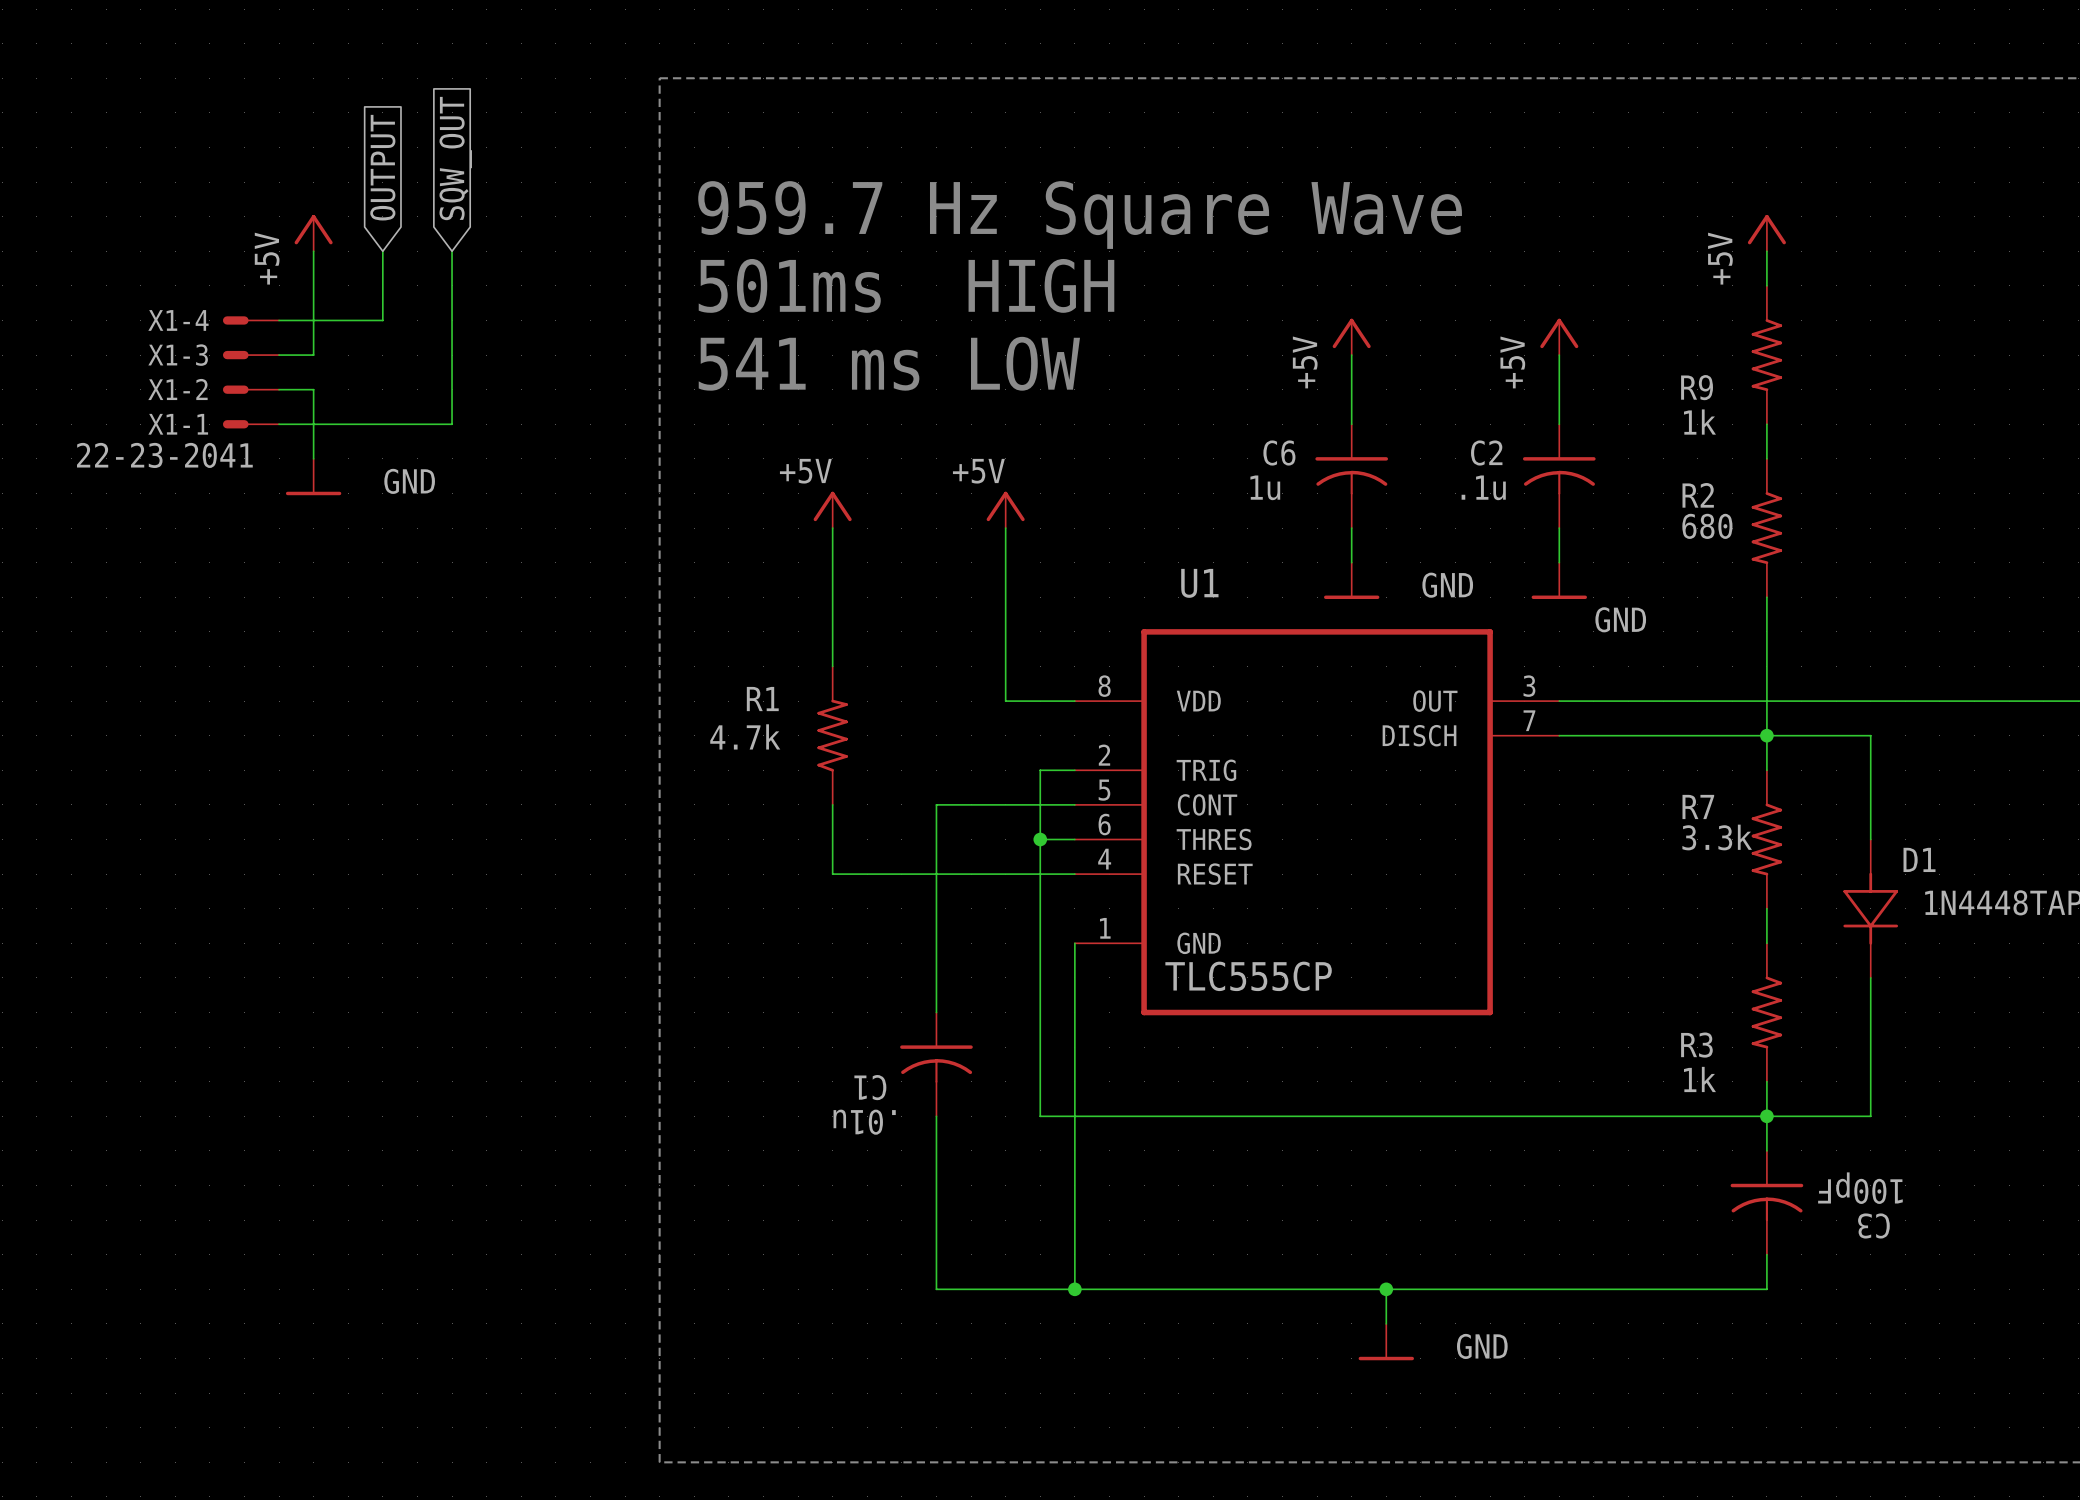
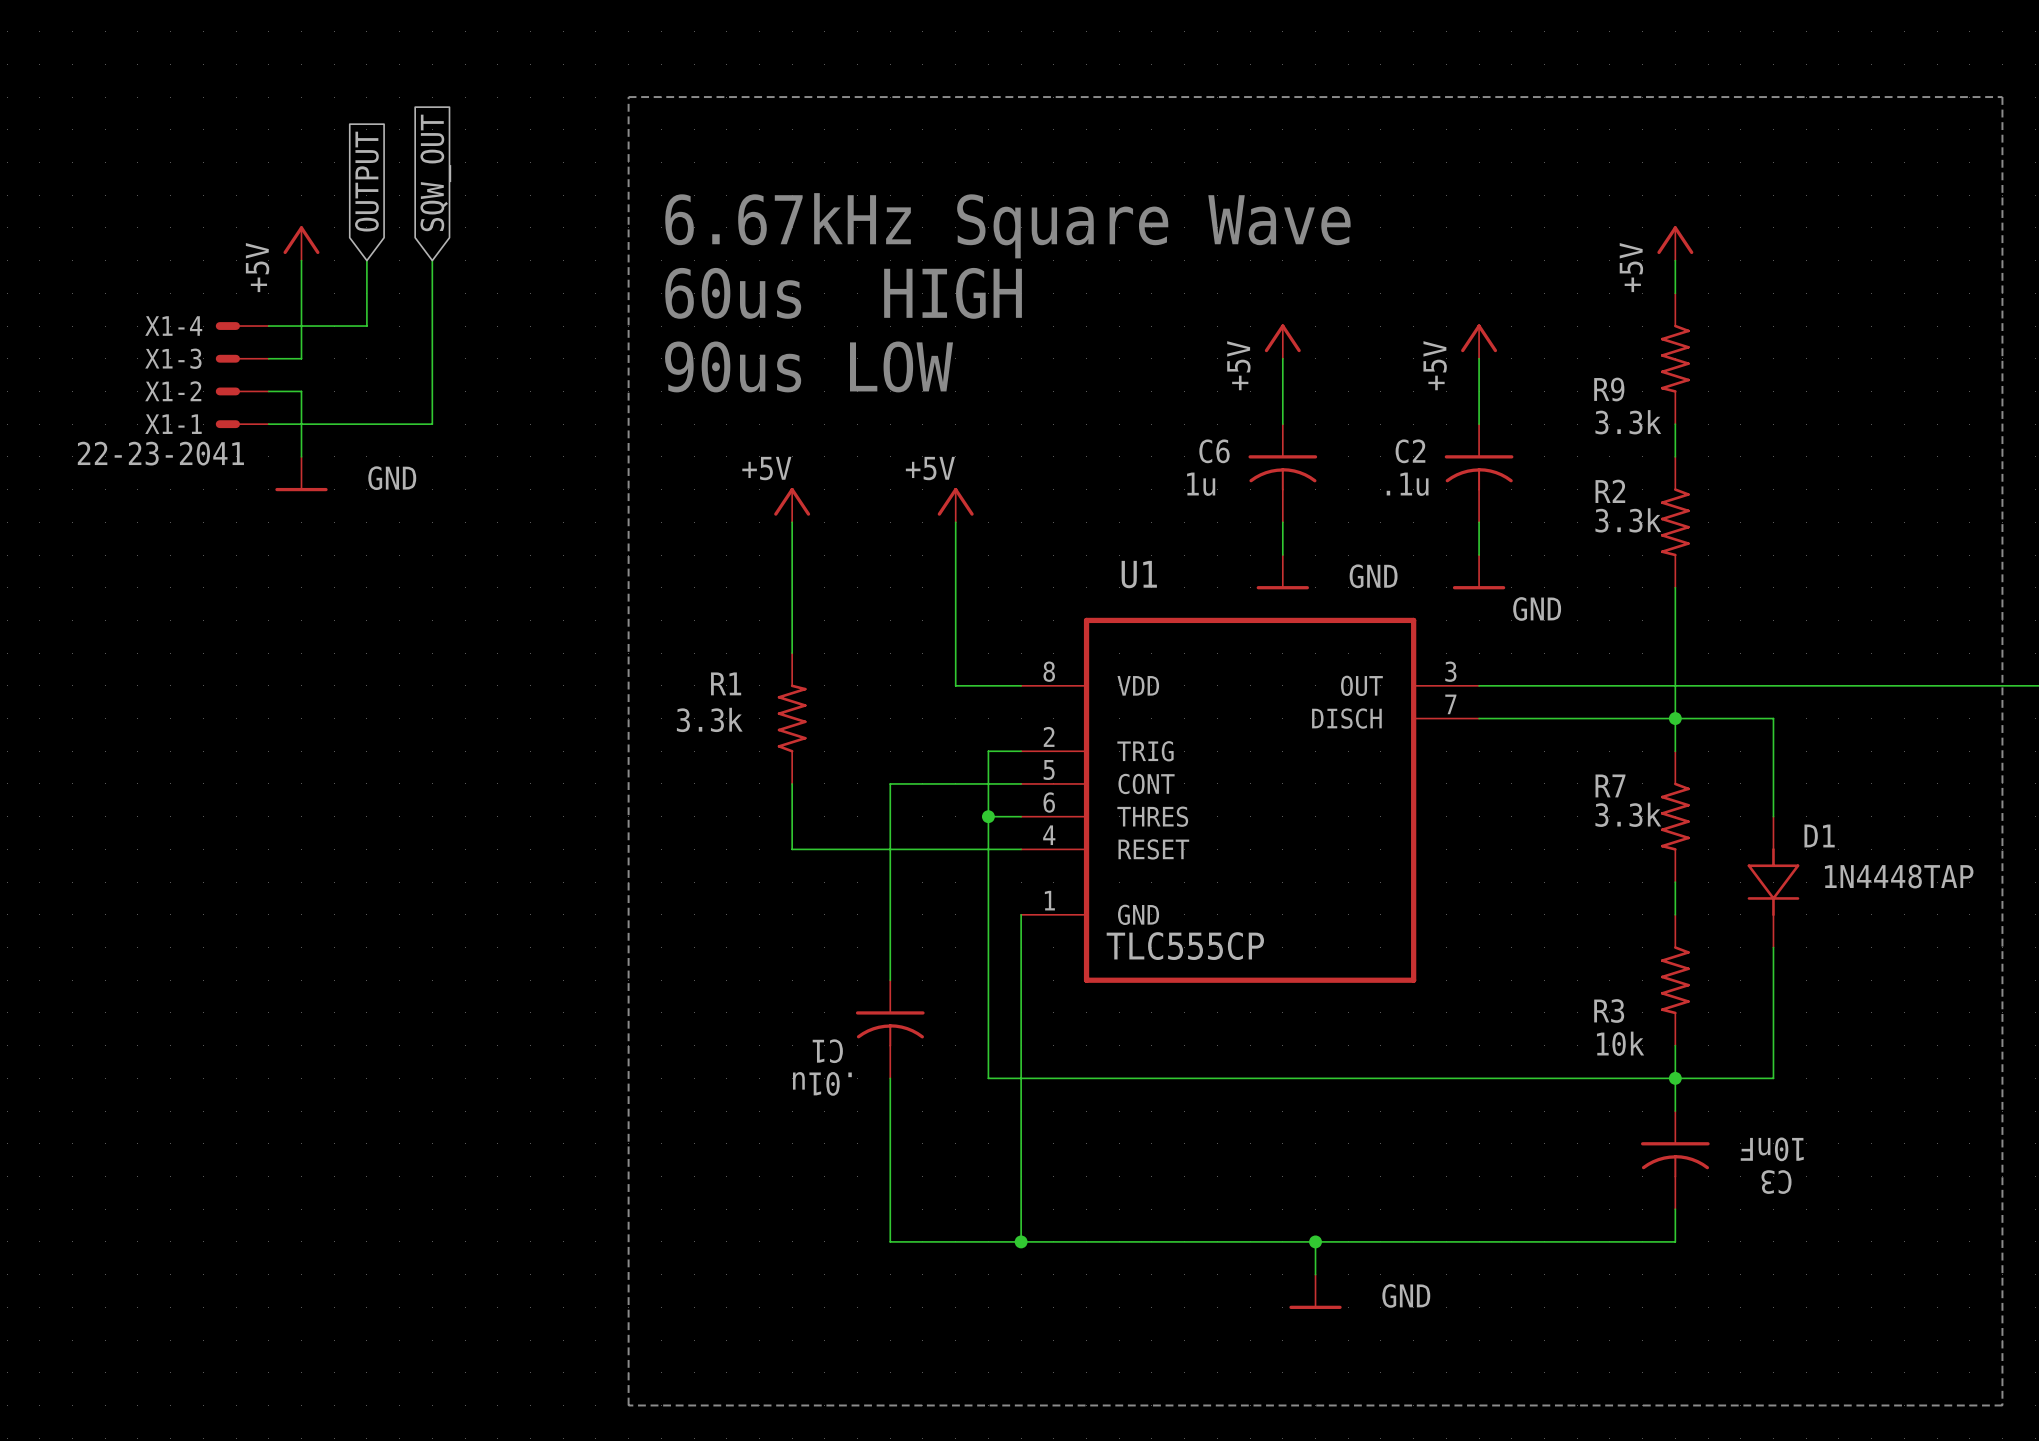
text: 959.7 Hz Square Wave (1080, 215) -> 6.67kHz Square Wave (1007, 225)
text: 501ms HIGH (906, 285) -> 60us HIGH (843, 293)
text: 541 ms LOW (889, 363) -> 90us LOW (809, 366)
R9 value: 1k (1699, 422) -> 3.3k (1628, 422)
R2 value: 680 (1707, 526) -> 3.3k (1628, 520)
R1 value: 4.7k (745, 736) -> 3.3k (709, 719)
R3 value: 1k (1699, 1079) -> 10k (1620, 1043)
C3 value: 100pF (1860, 1188) -> 10nF (1772, 1149)

